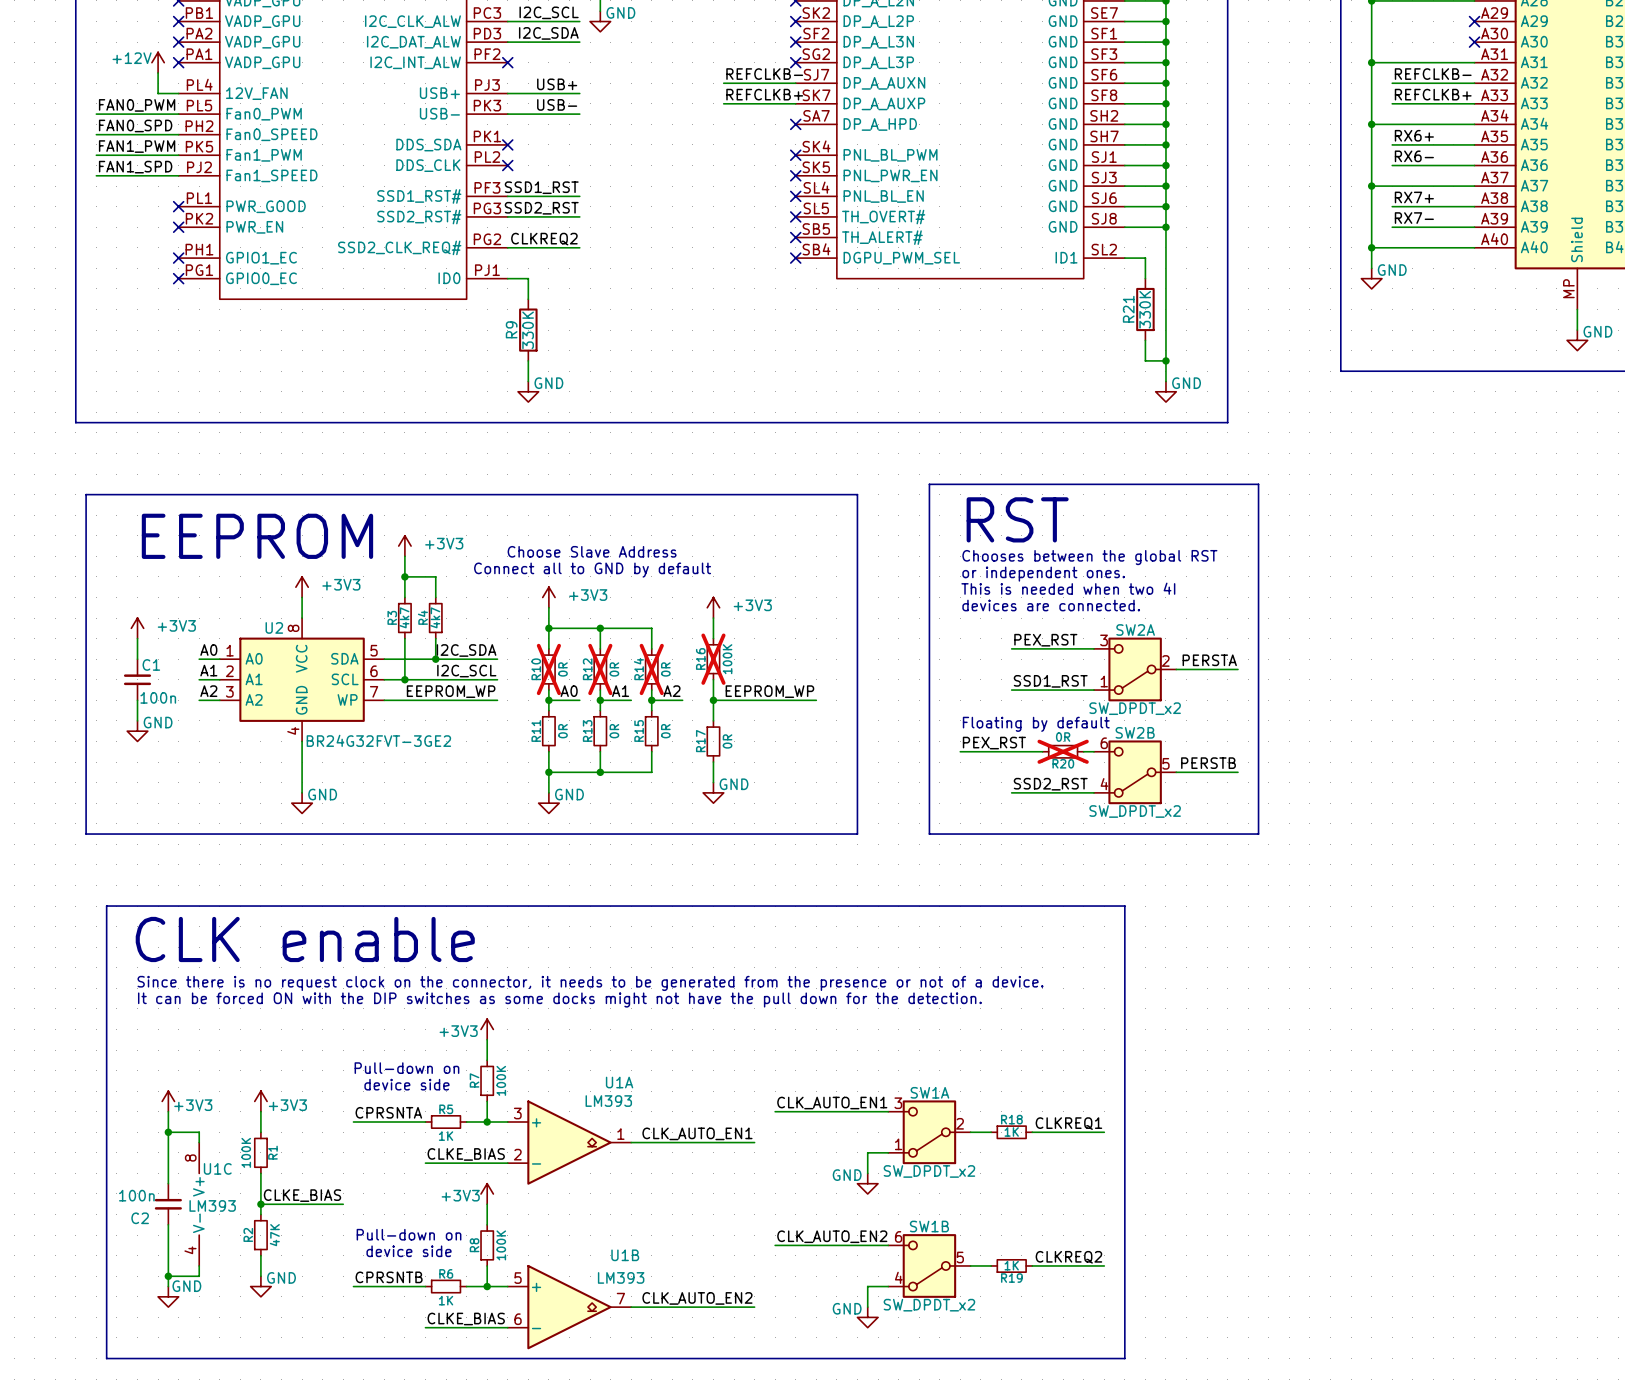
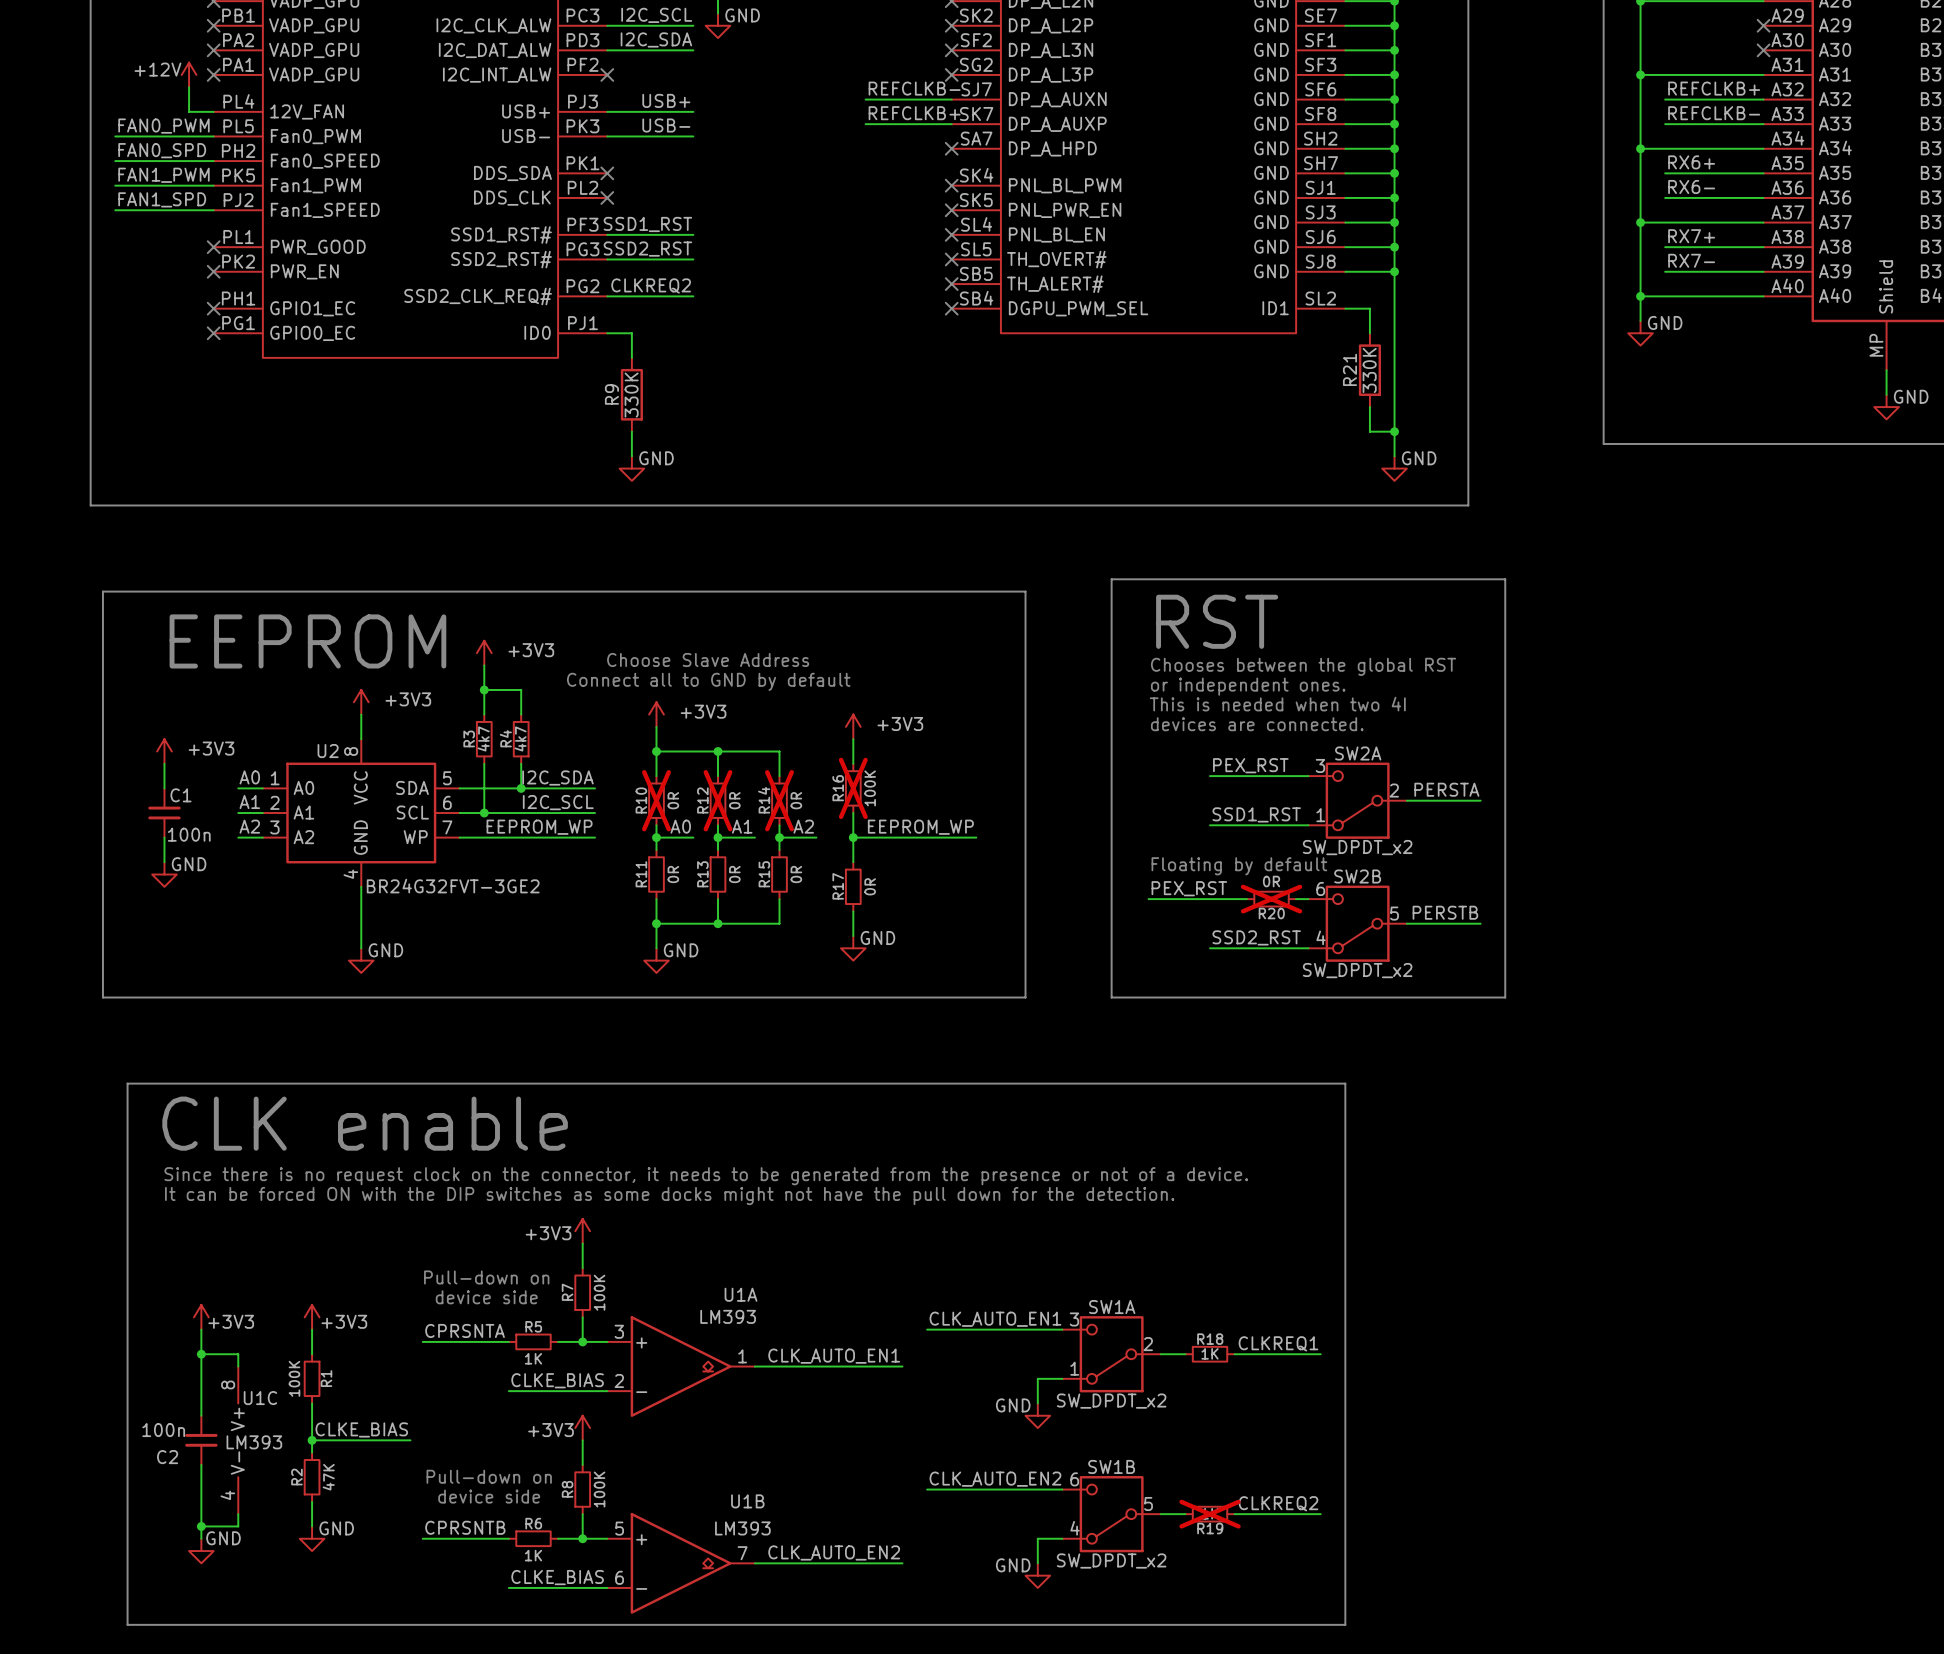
label: REFCLKB- (1433, 74) -> REFCLKB+ (1714, 88)
label: REFCLKB+ (1433, 94) -> REFCLKB- (1714, 113)
R19 do-not-place cross: none -> (1210, 1514)

